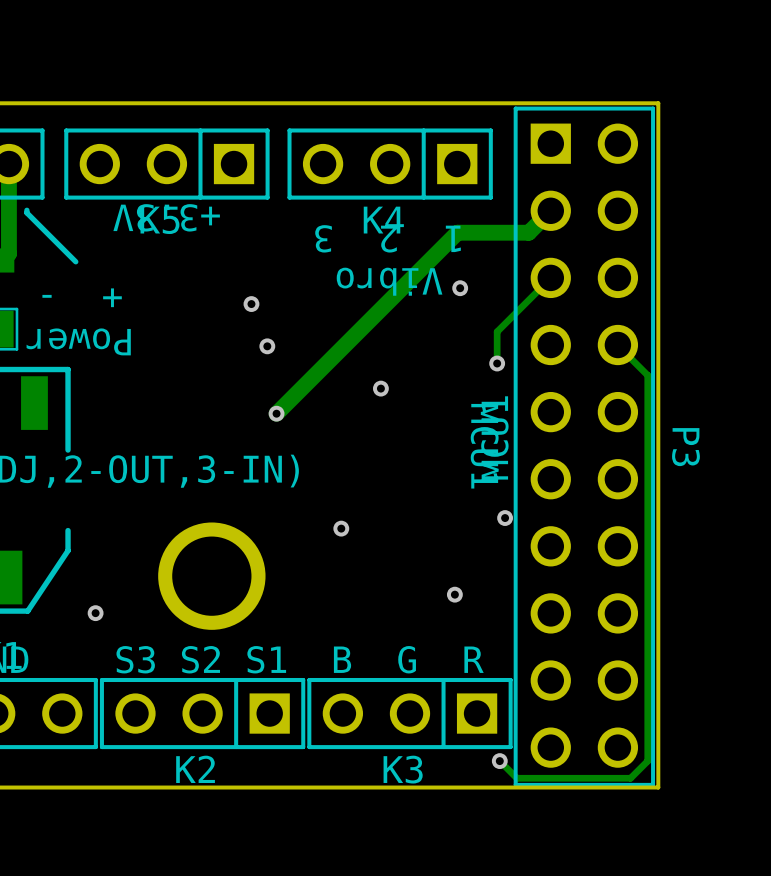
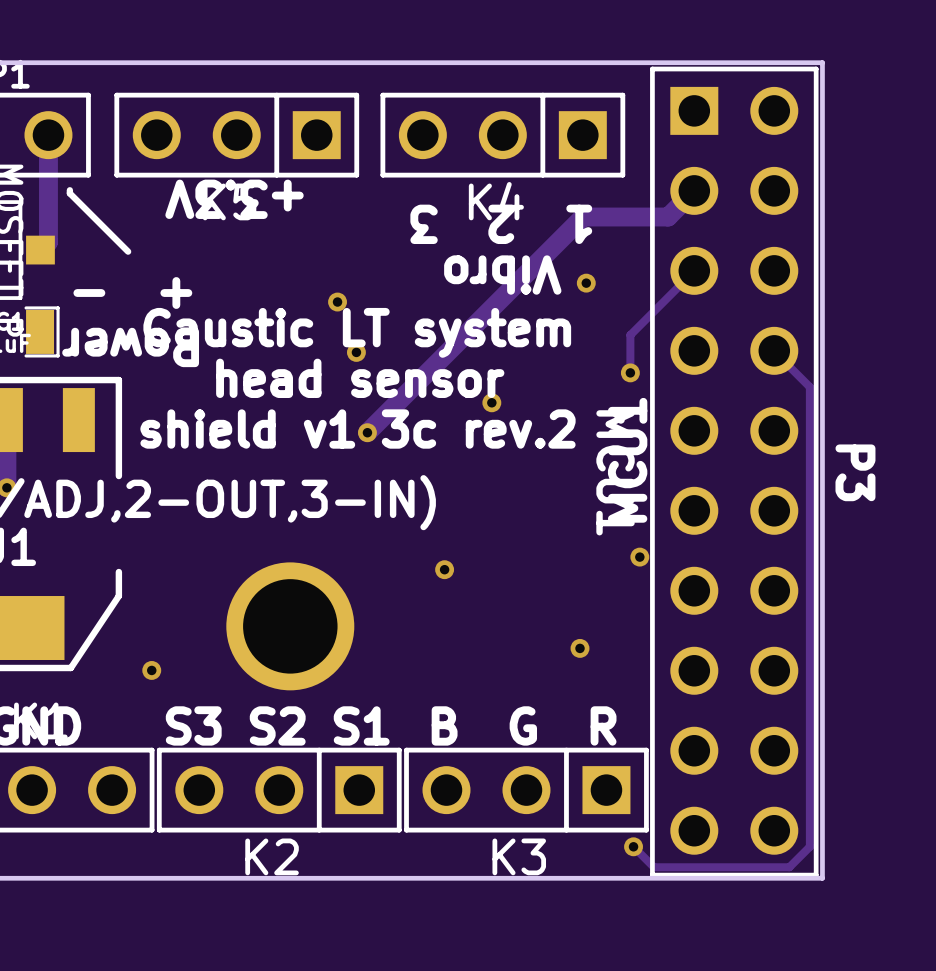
text: none -> Caustic LT system (357, 332)
text: none -> head sensor (360, 378)
text: none -> shield v1 3c rev.2 (358, 429)

